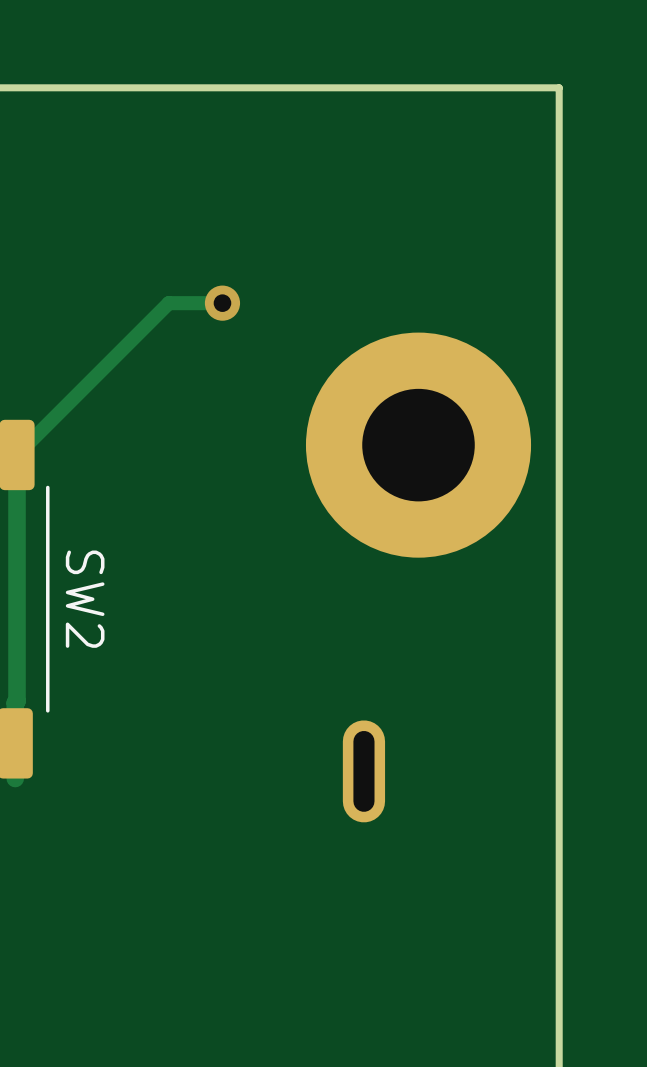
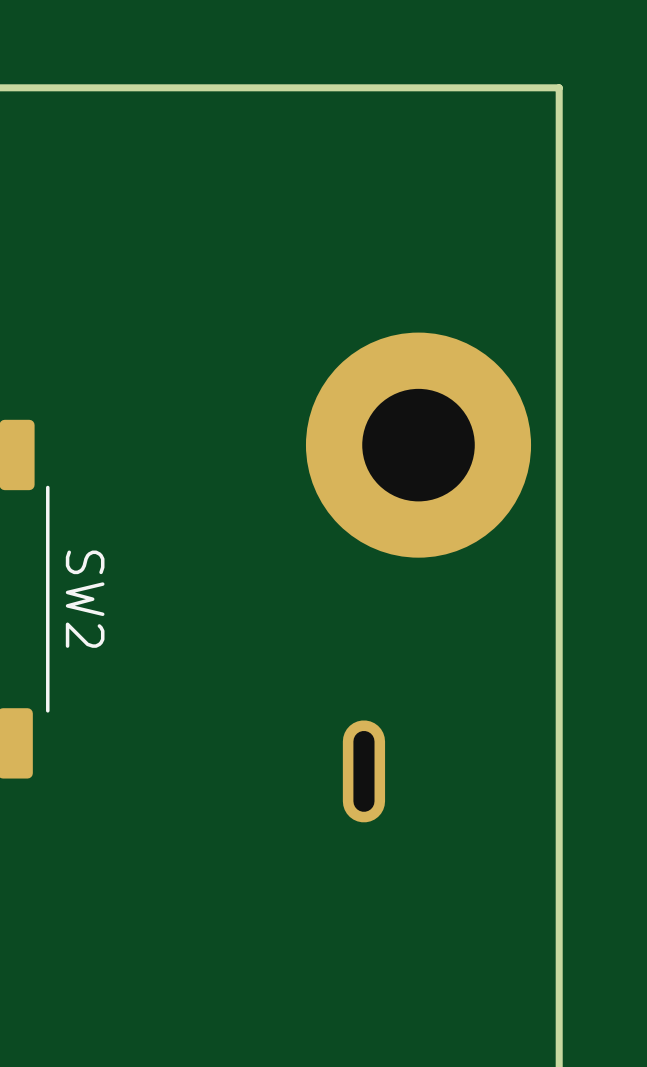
track: (222, 303) (168, 303) (17, 454) (15, 778) -> none
via: (222, 303) -> none

